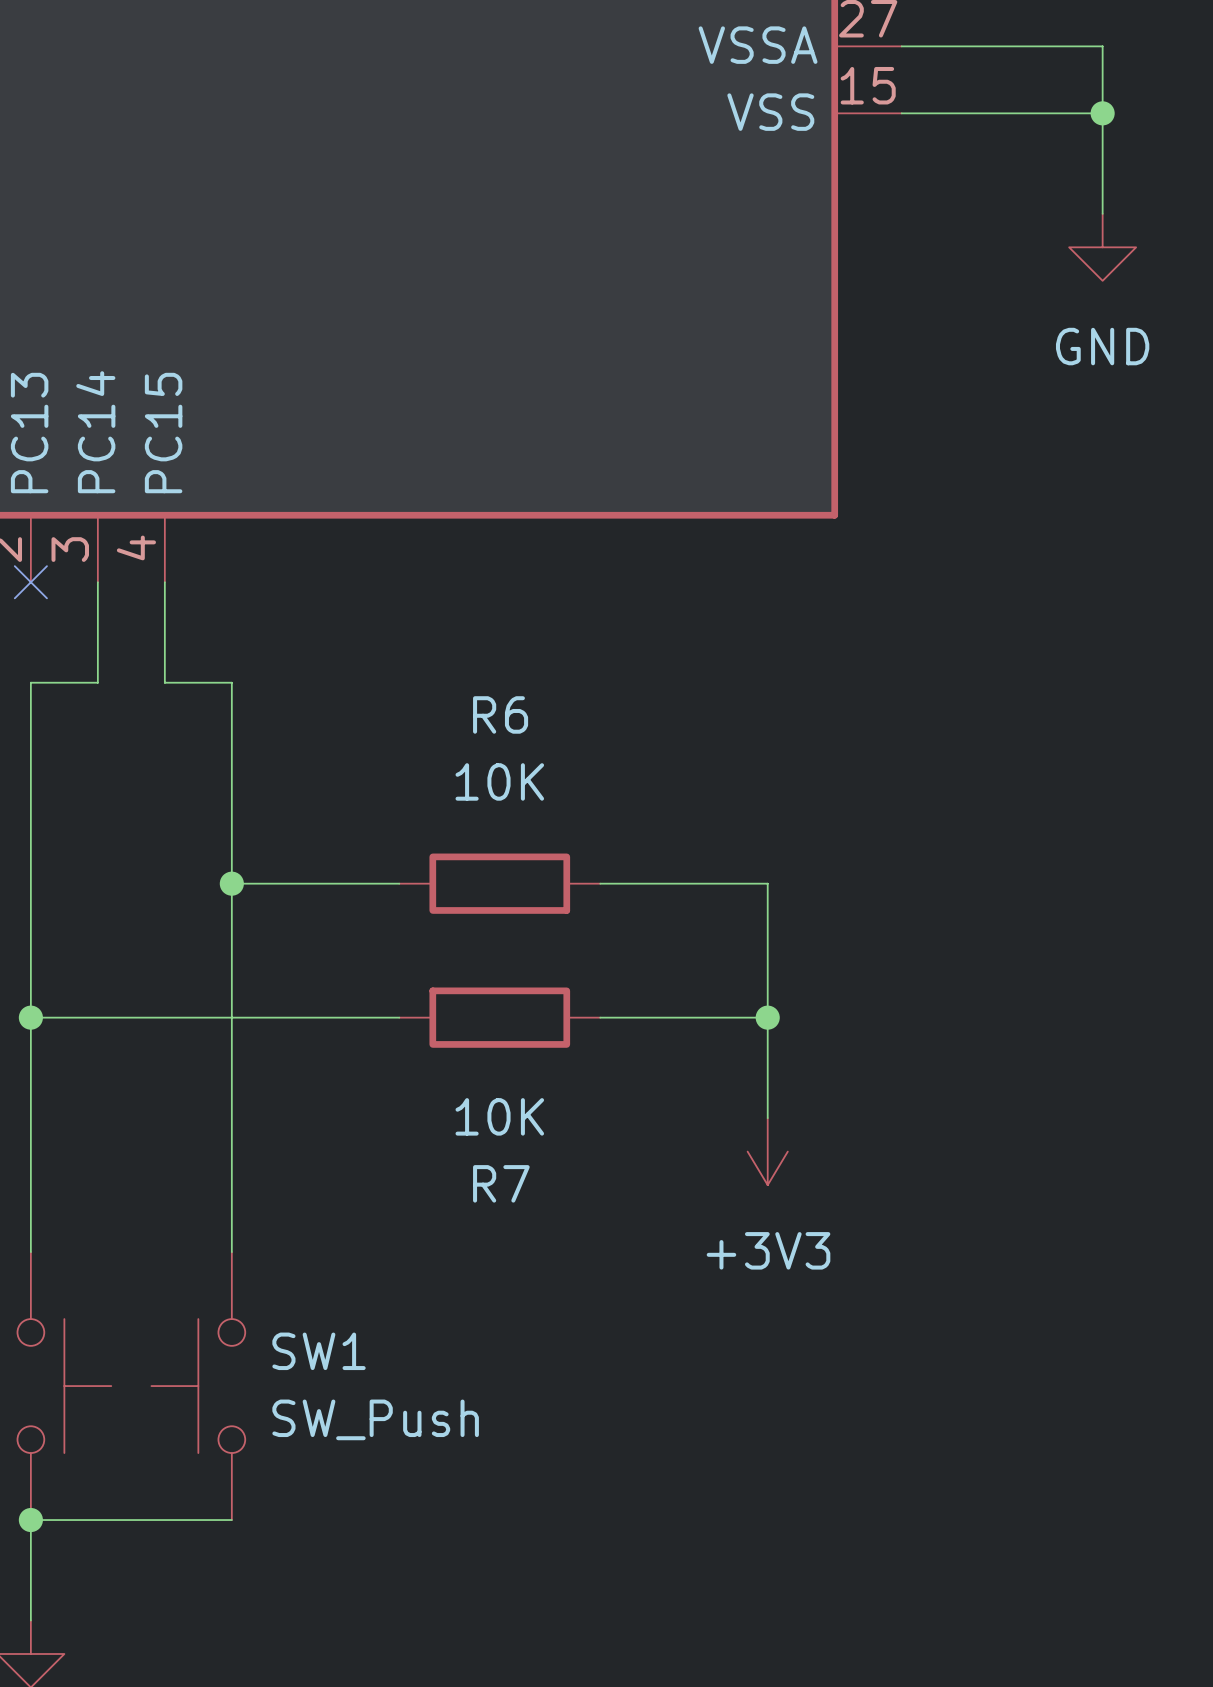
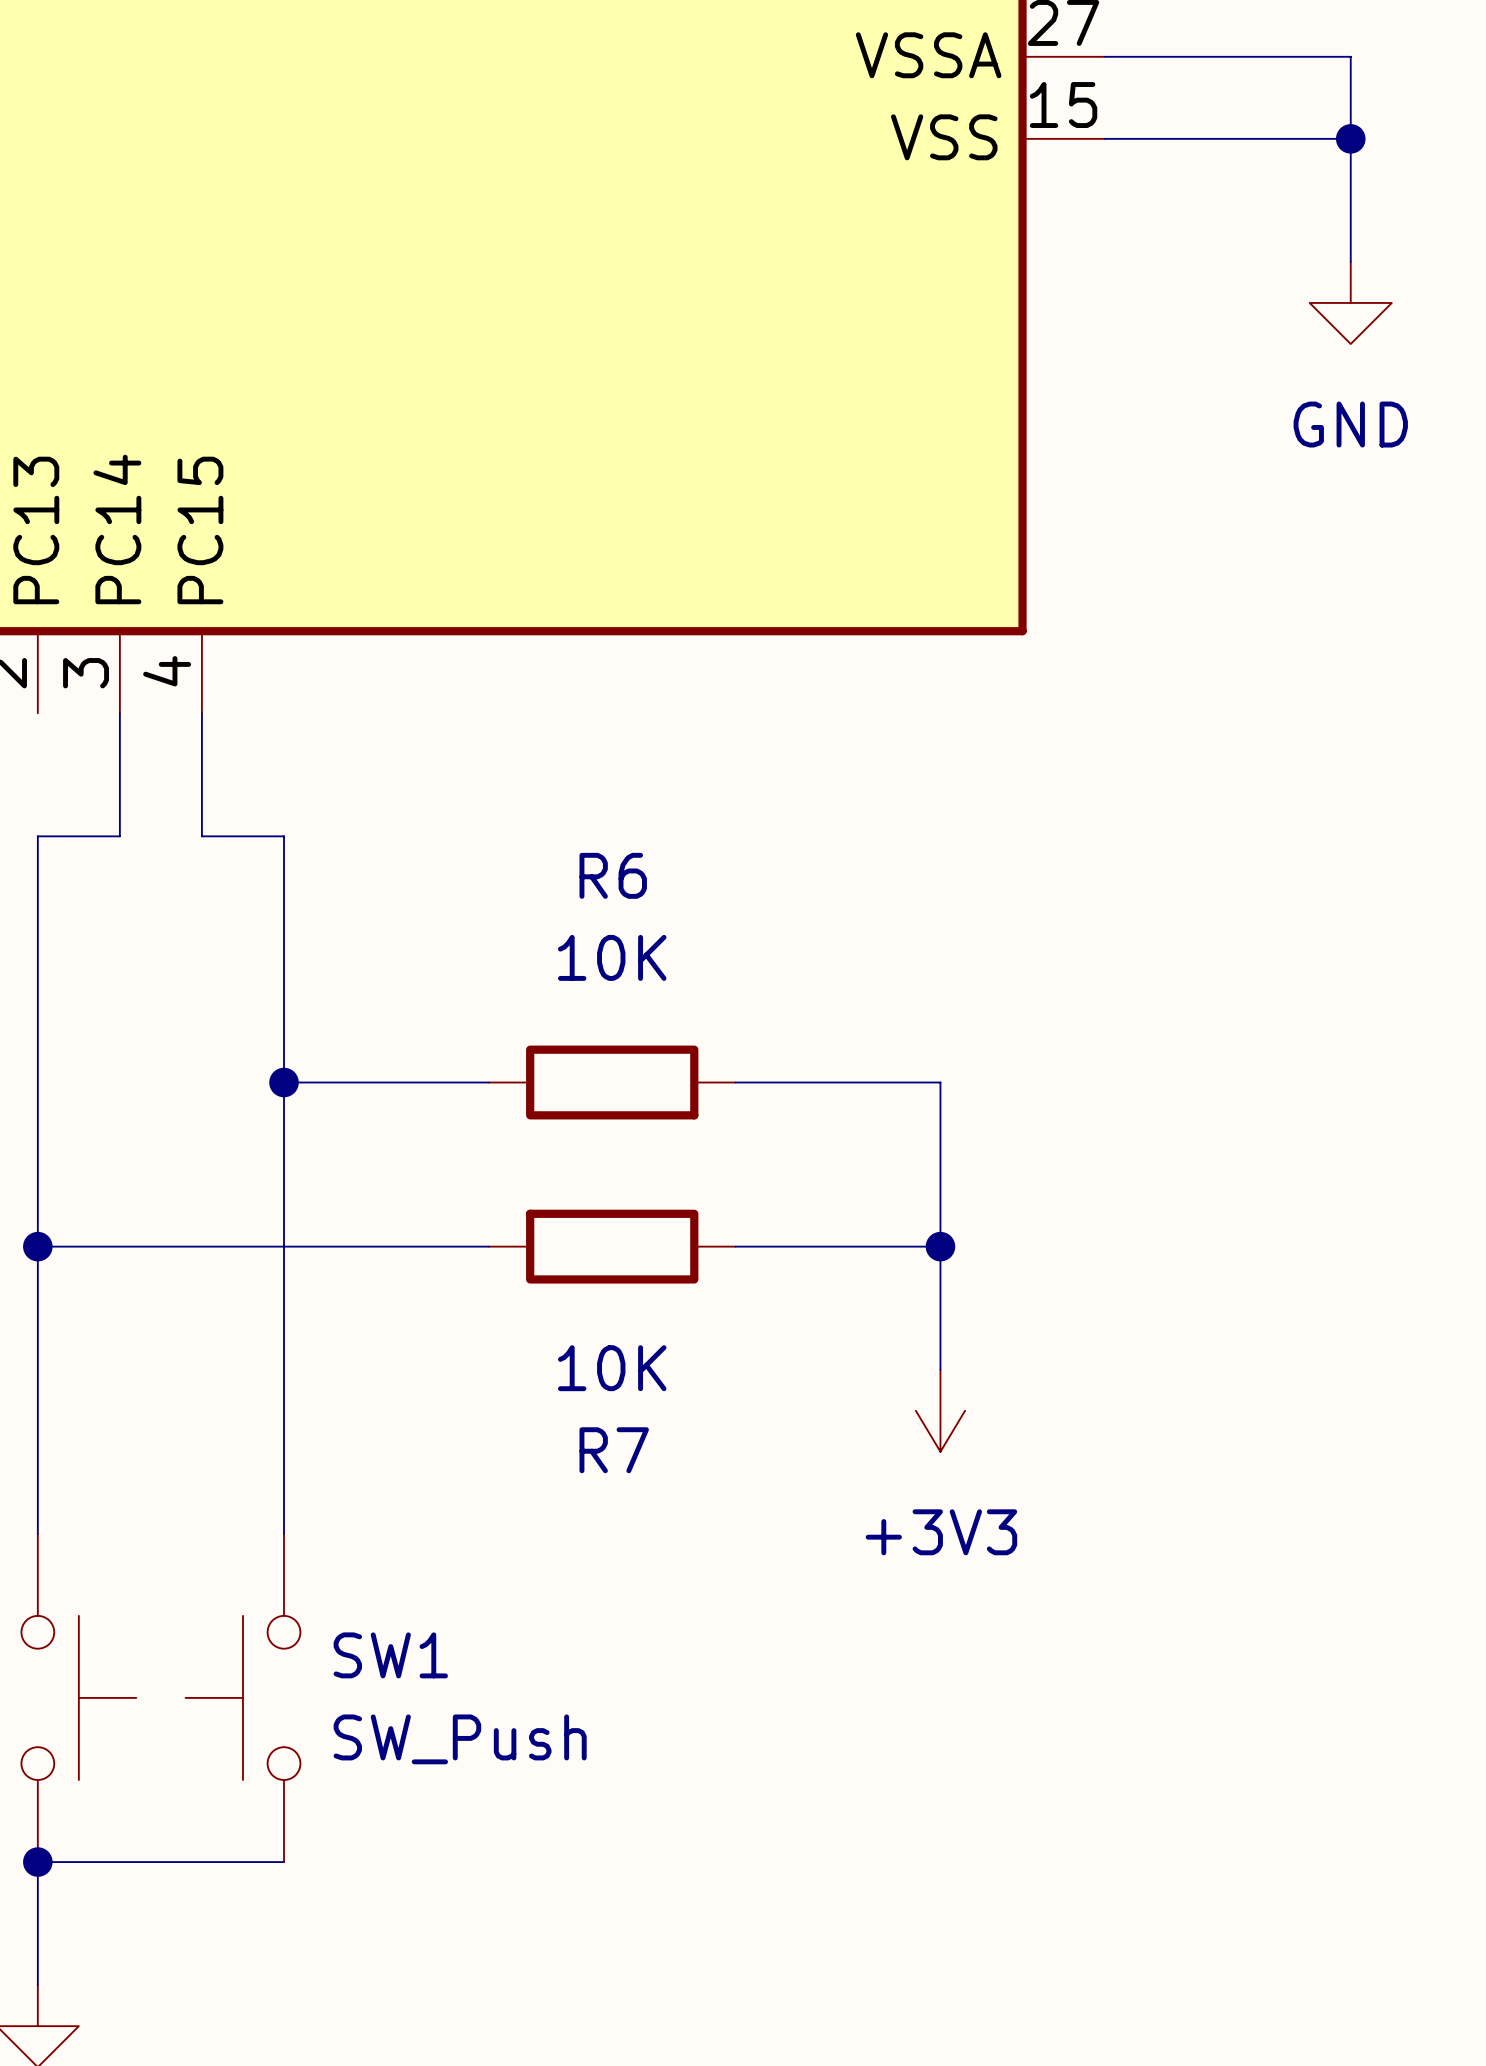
no-connect mark: (30, 582) -> none

